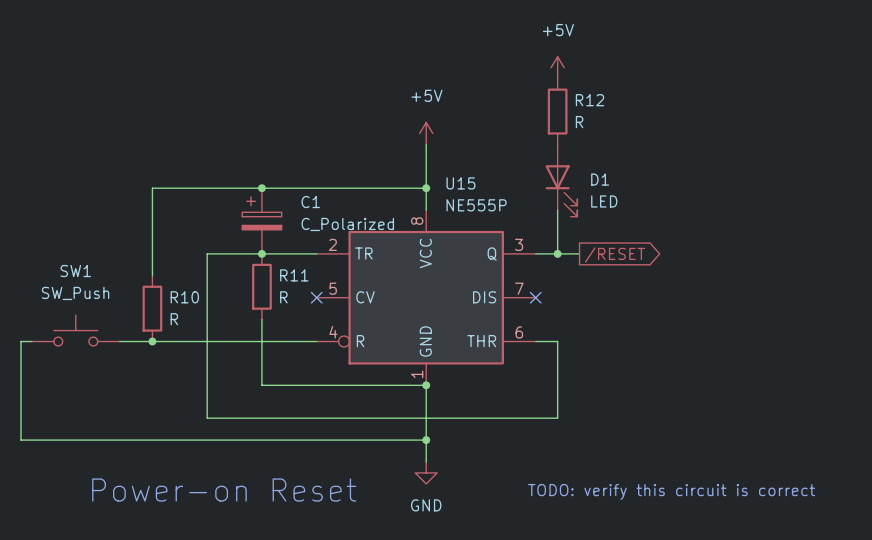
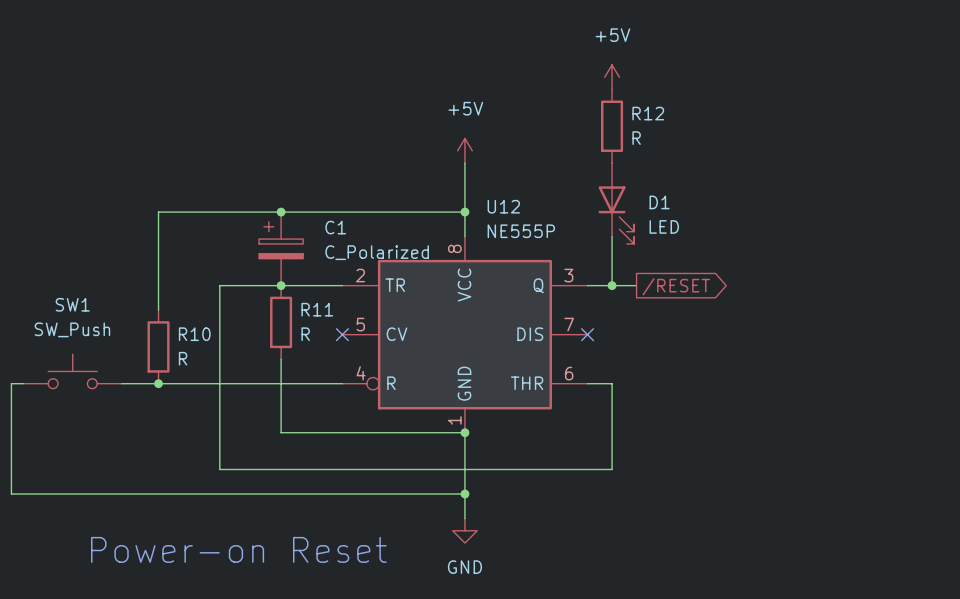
U15 name: U15 (460, 183) -> U12 (503, 206)
text: TODO: verify this circuit is correct (671, 491) -> none

